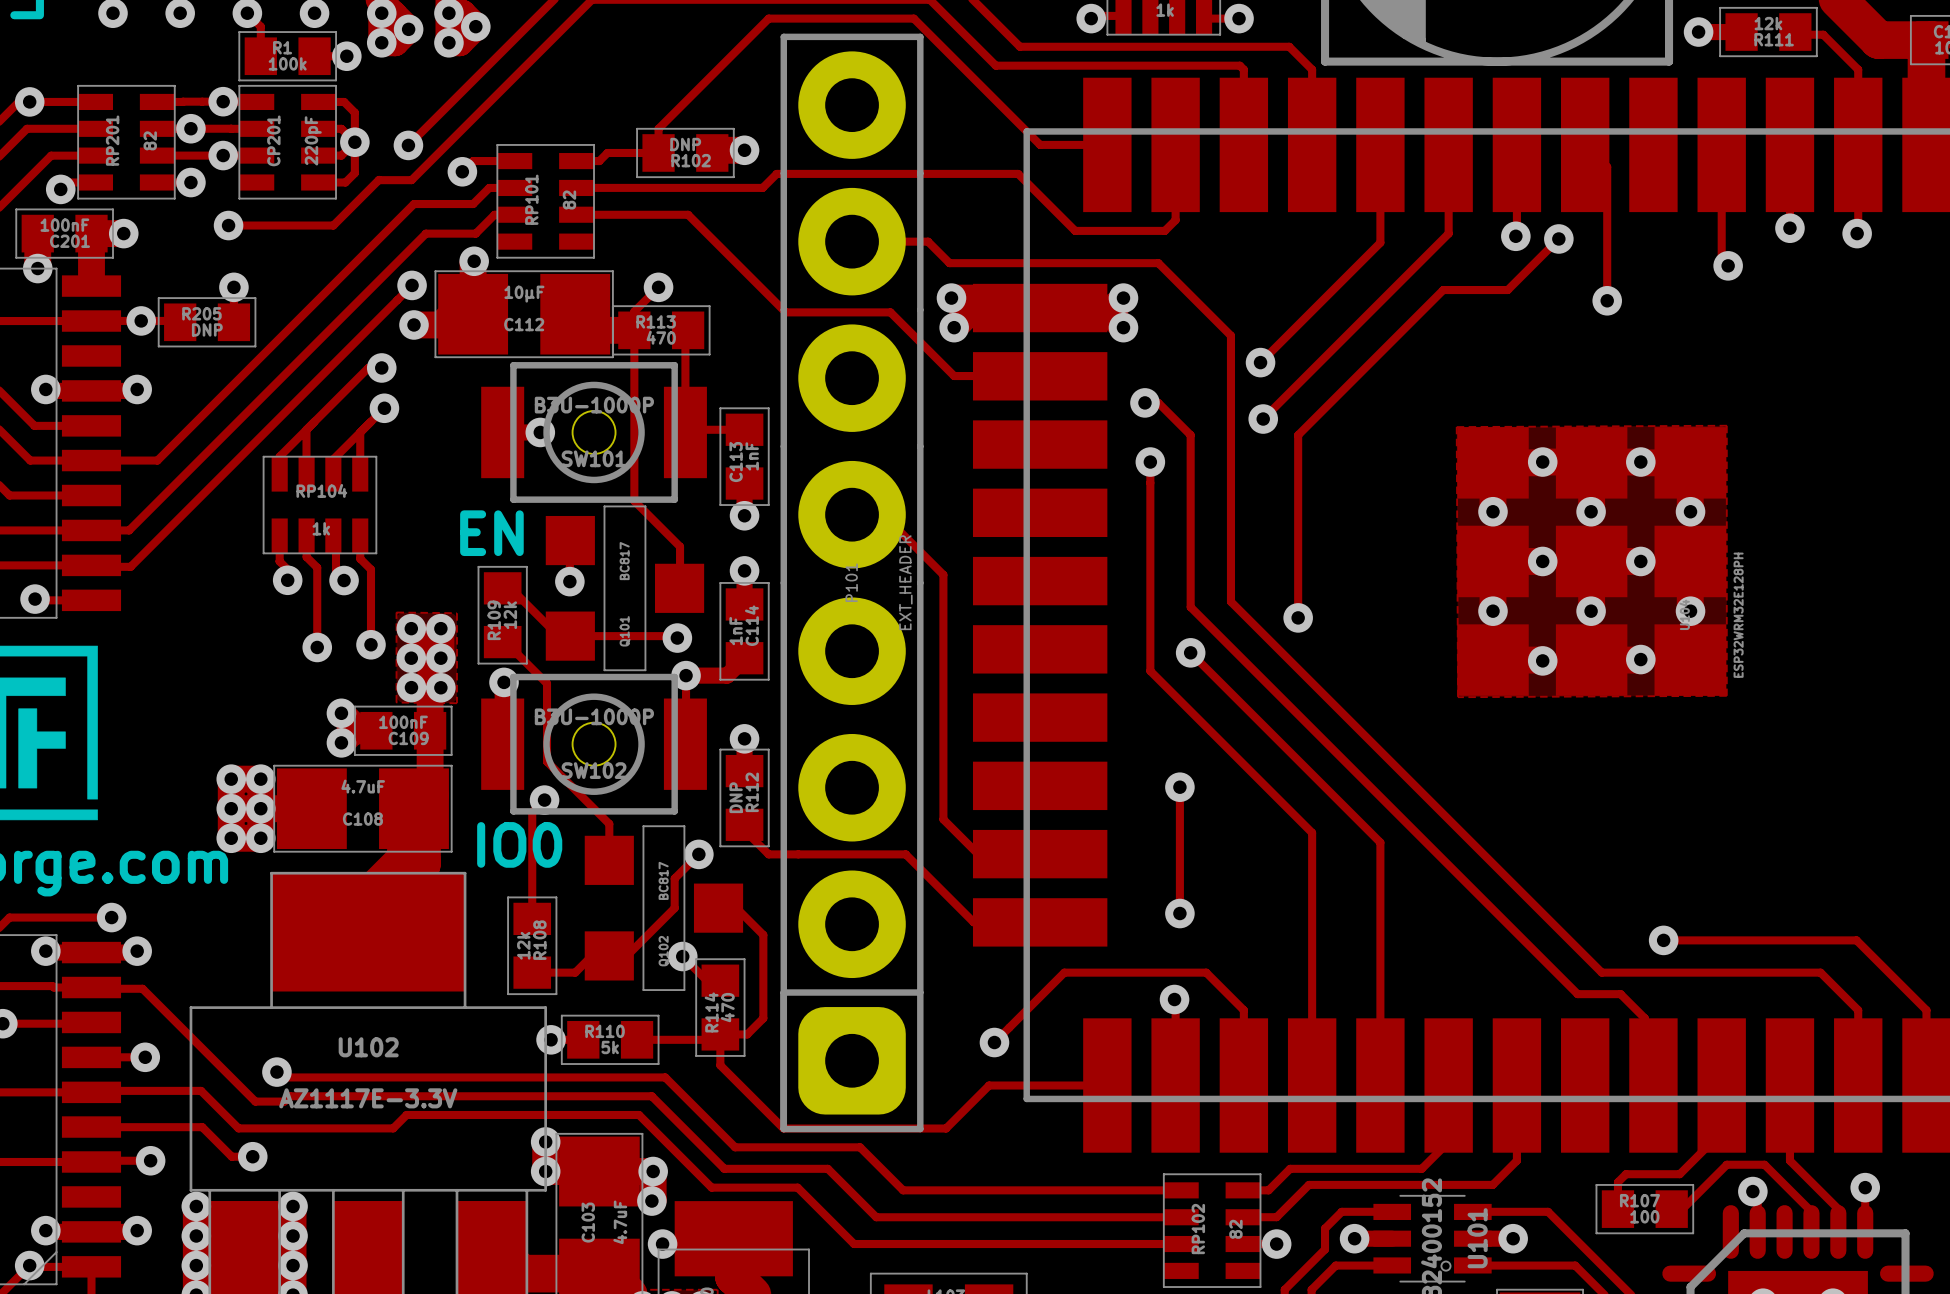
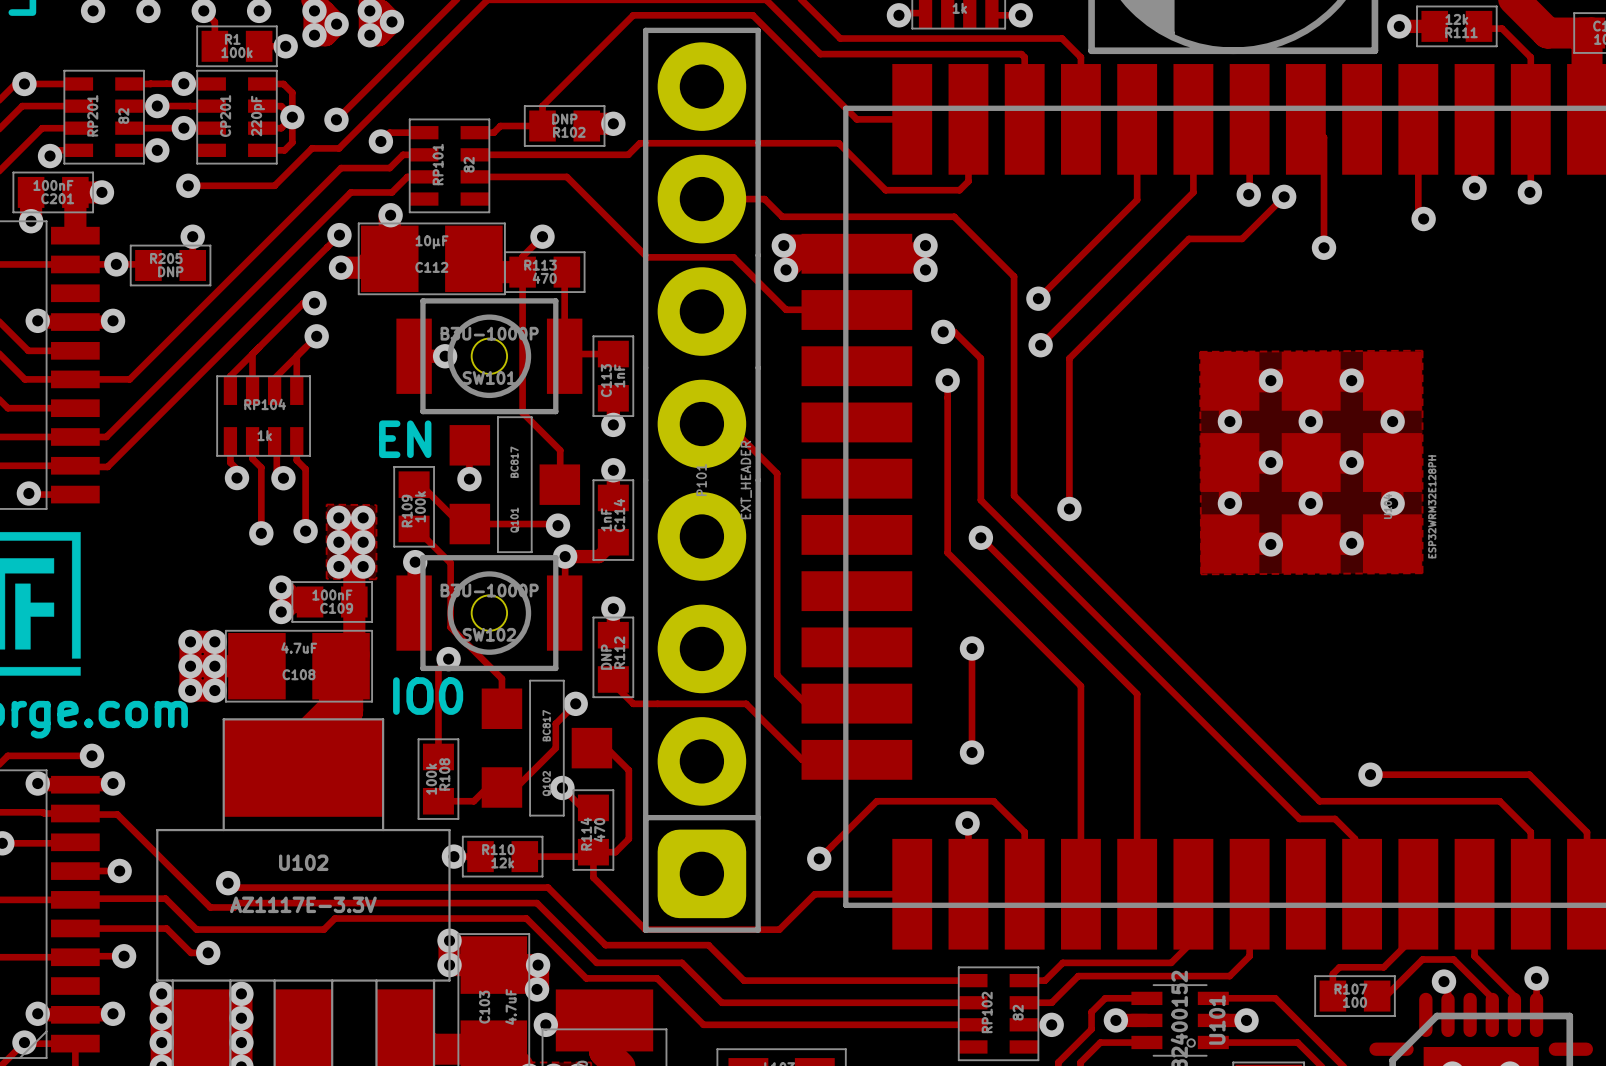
R109 value: 12k (510, 615) -> 100k (420, 506)
R108 value: 12k (523, 945) -> 100k (431, 779)
R110 value: 5k (610, 1047) -> 12k (502, 862)

